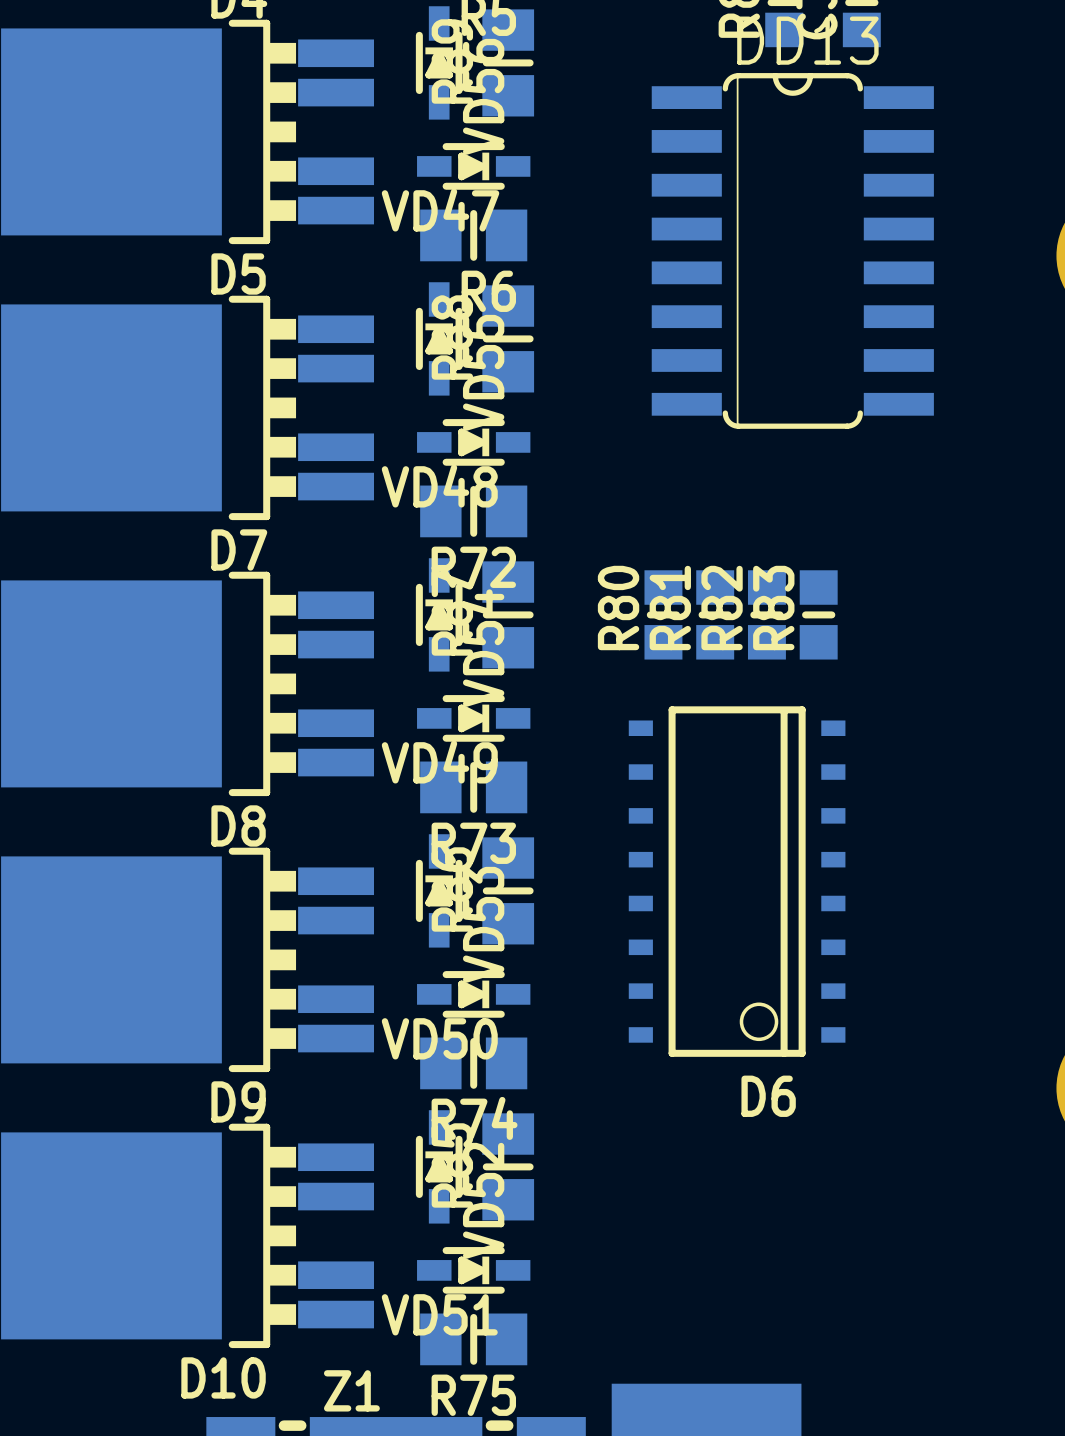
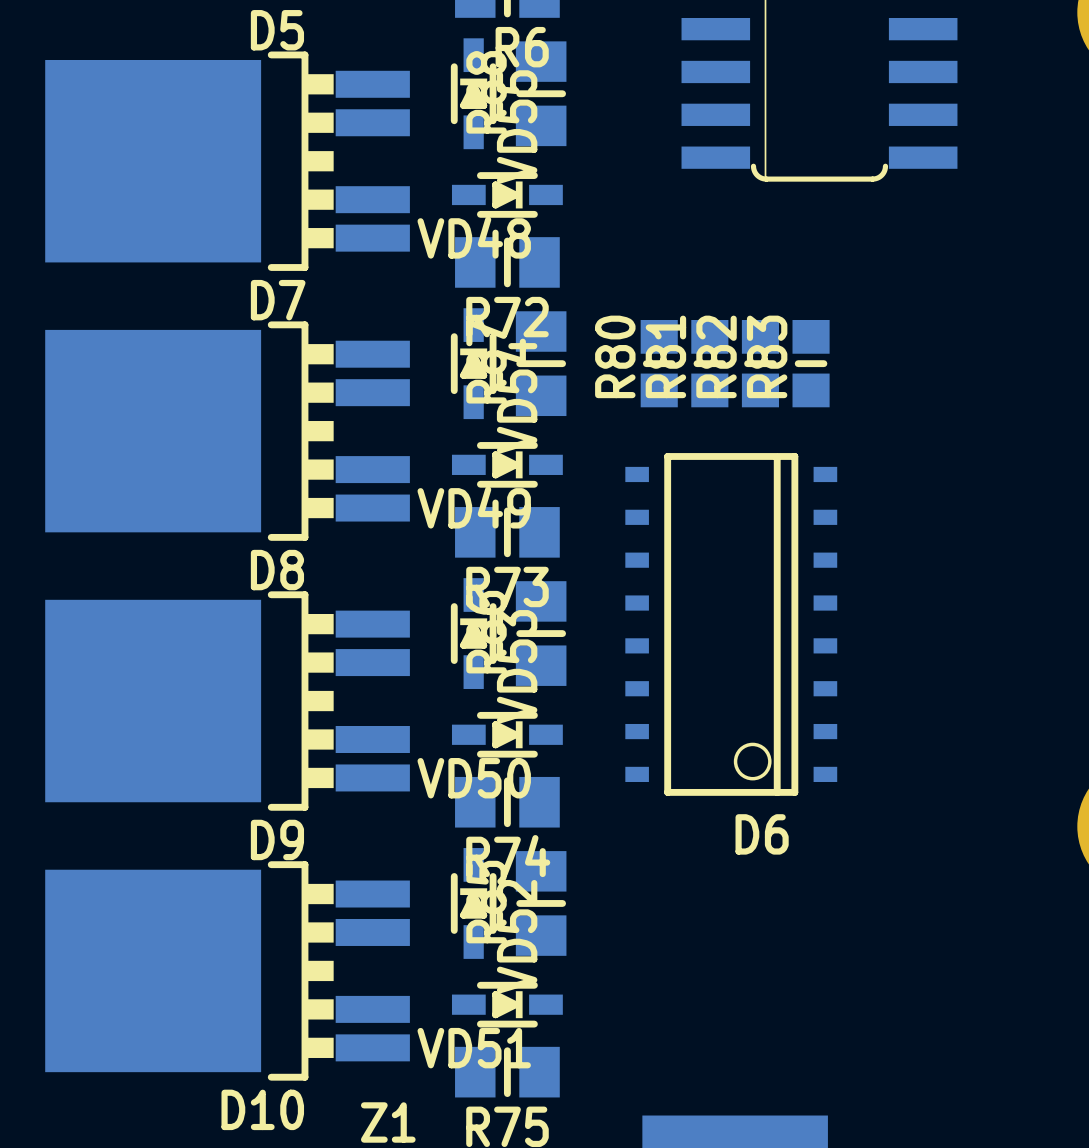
R80 position: (663, 614) -> (659, 363)
R81 position: (715, 614) -> (709, 363)
R82 position: (766, 614) -> (760, 363)
R83 position: (818, 614) -> (811, 363)
D6 position: (737, 881) -> (731, 624)

